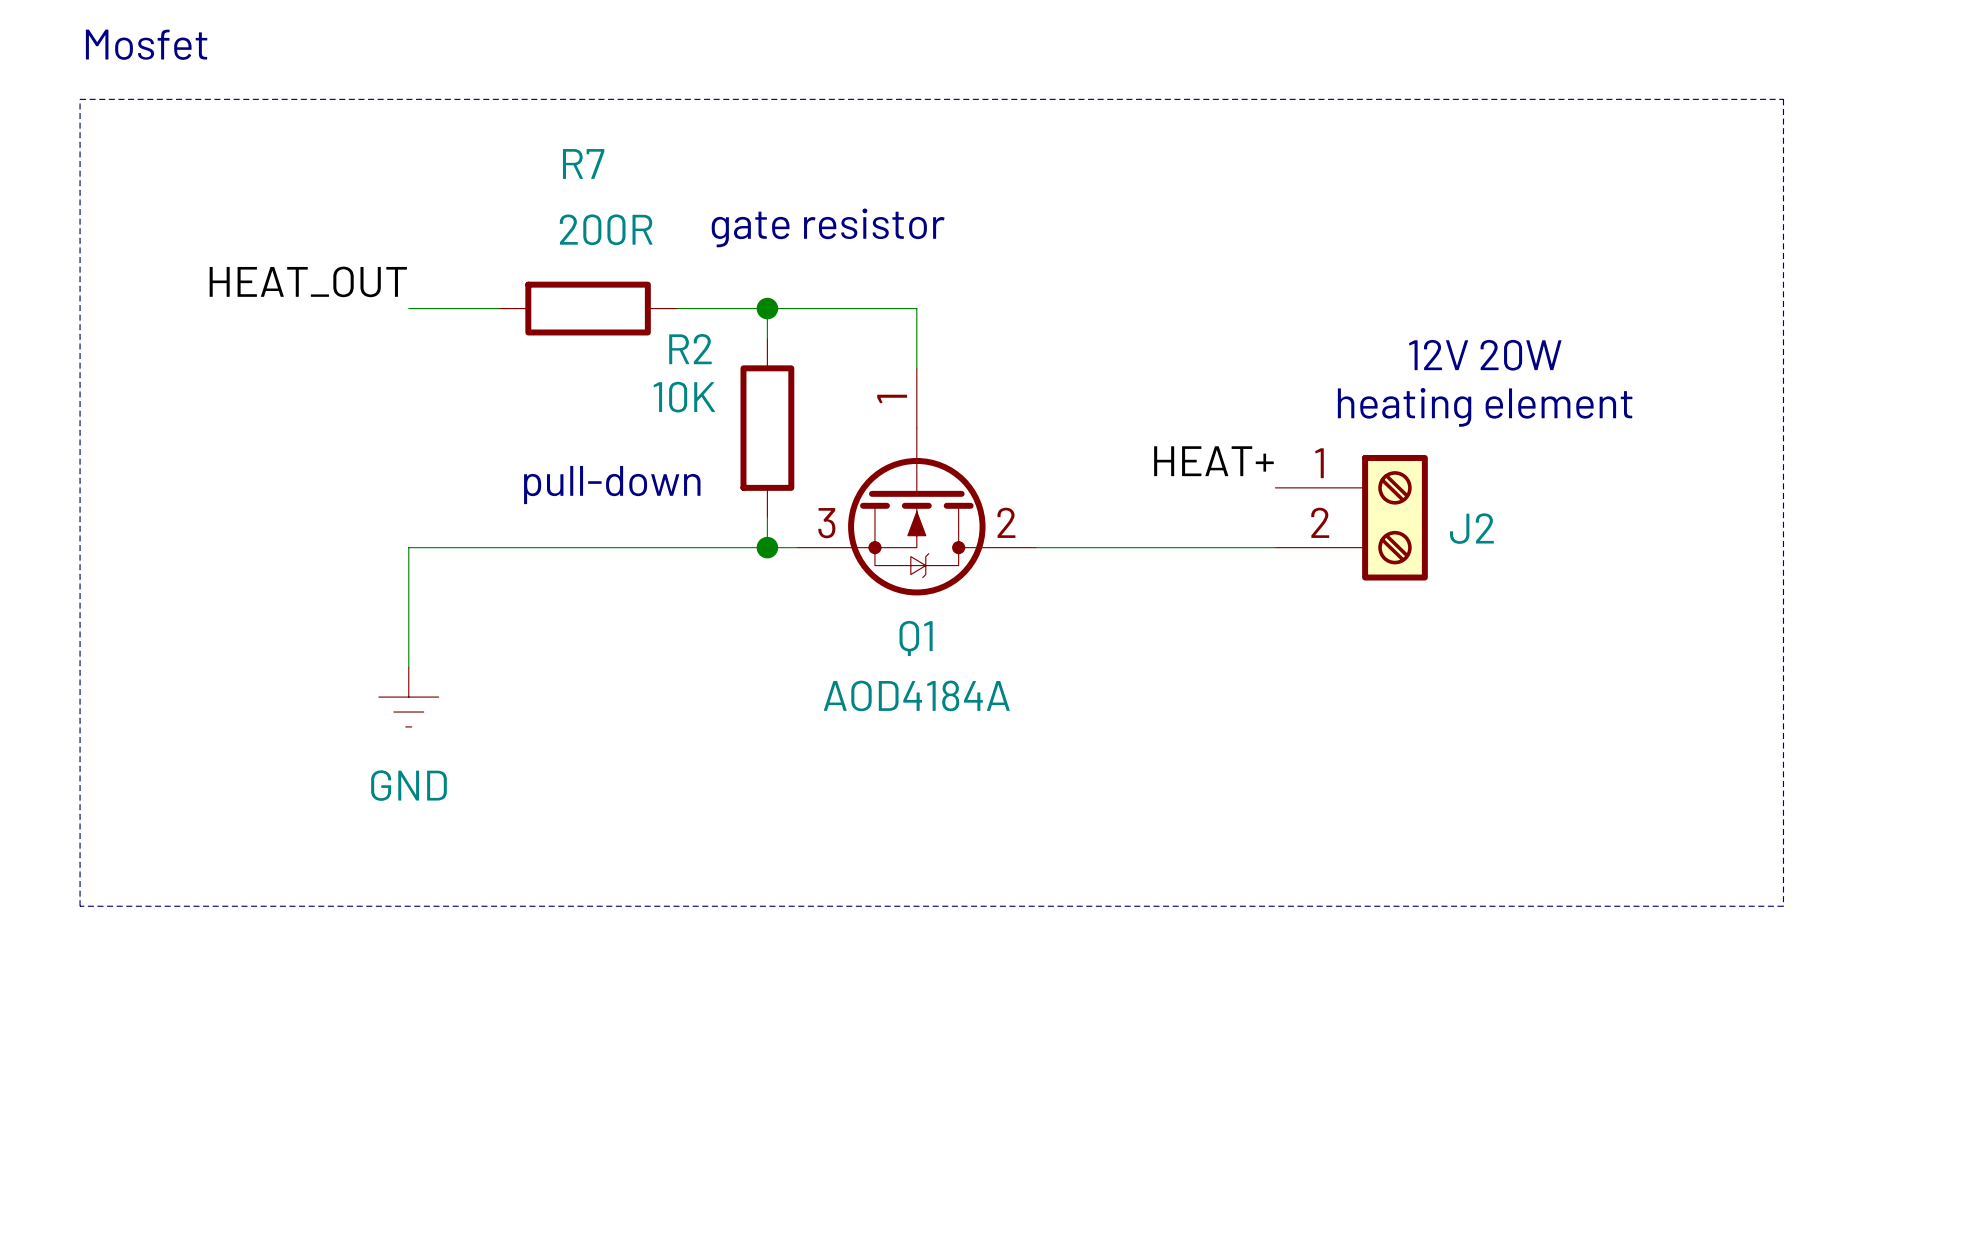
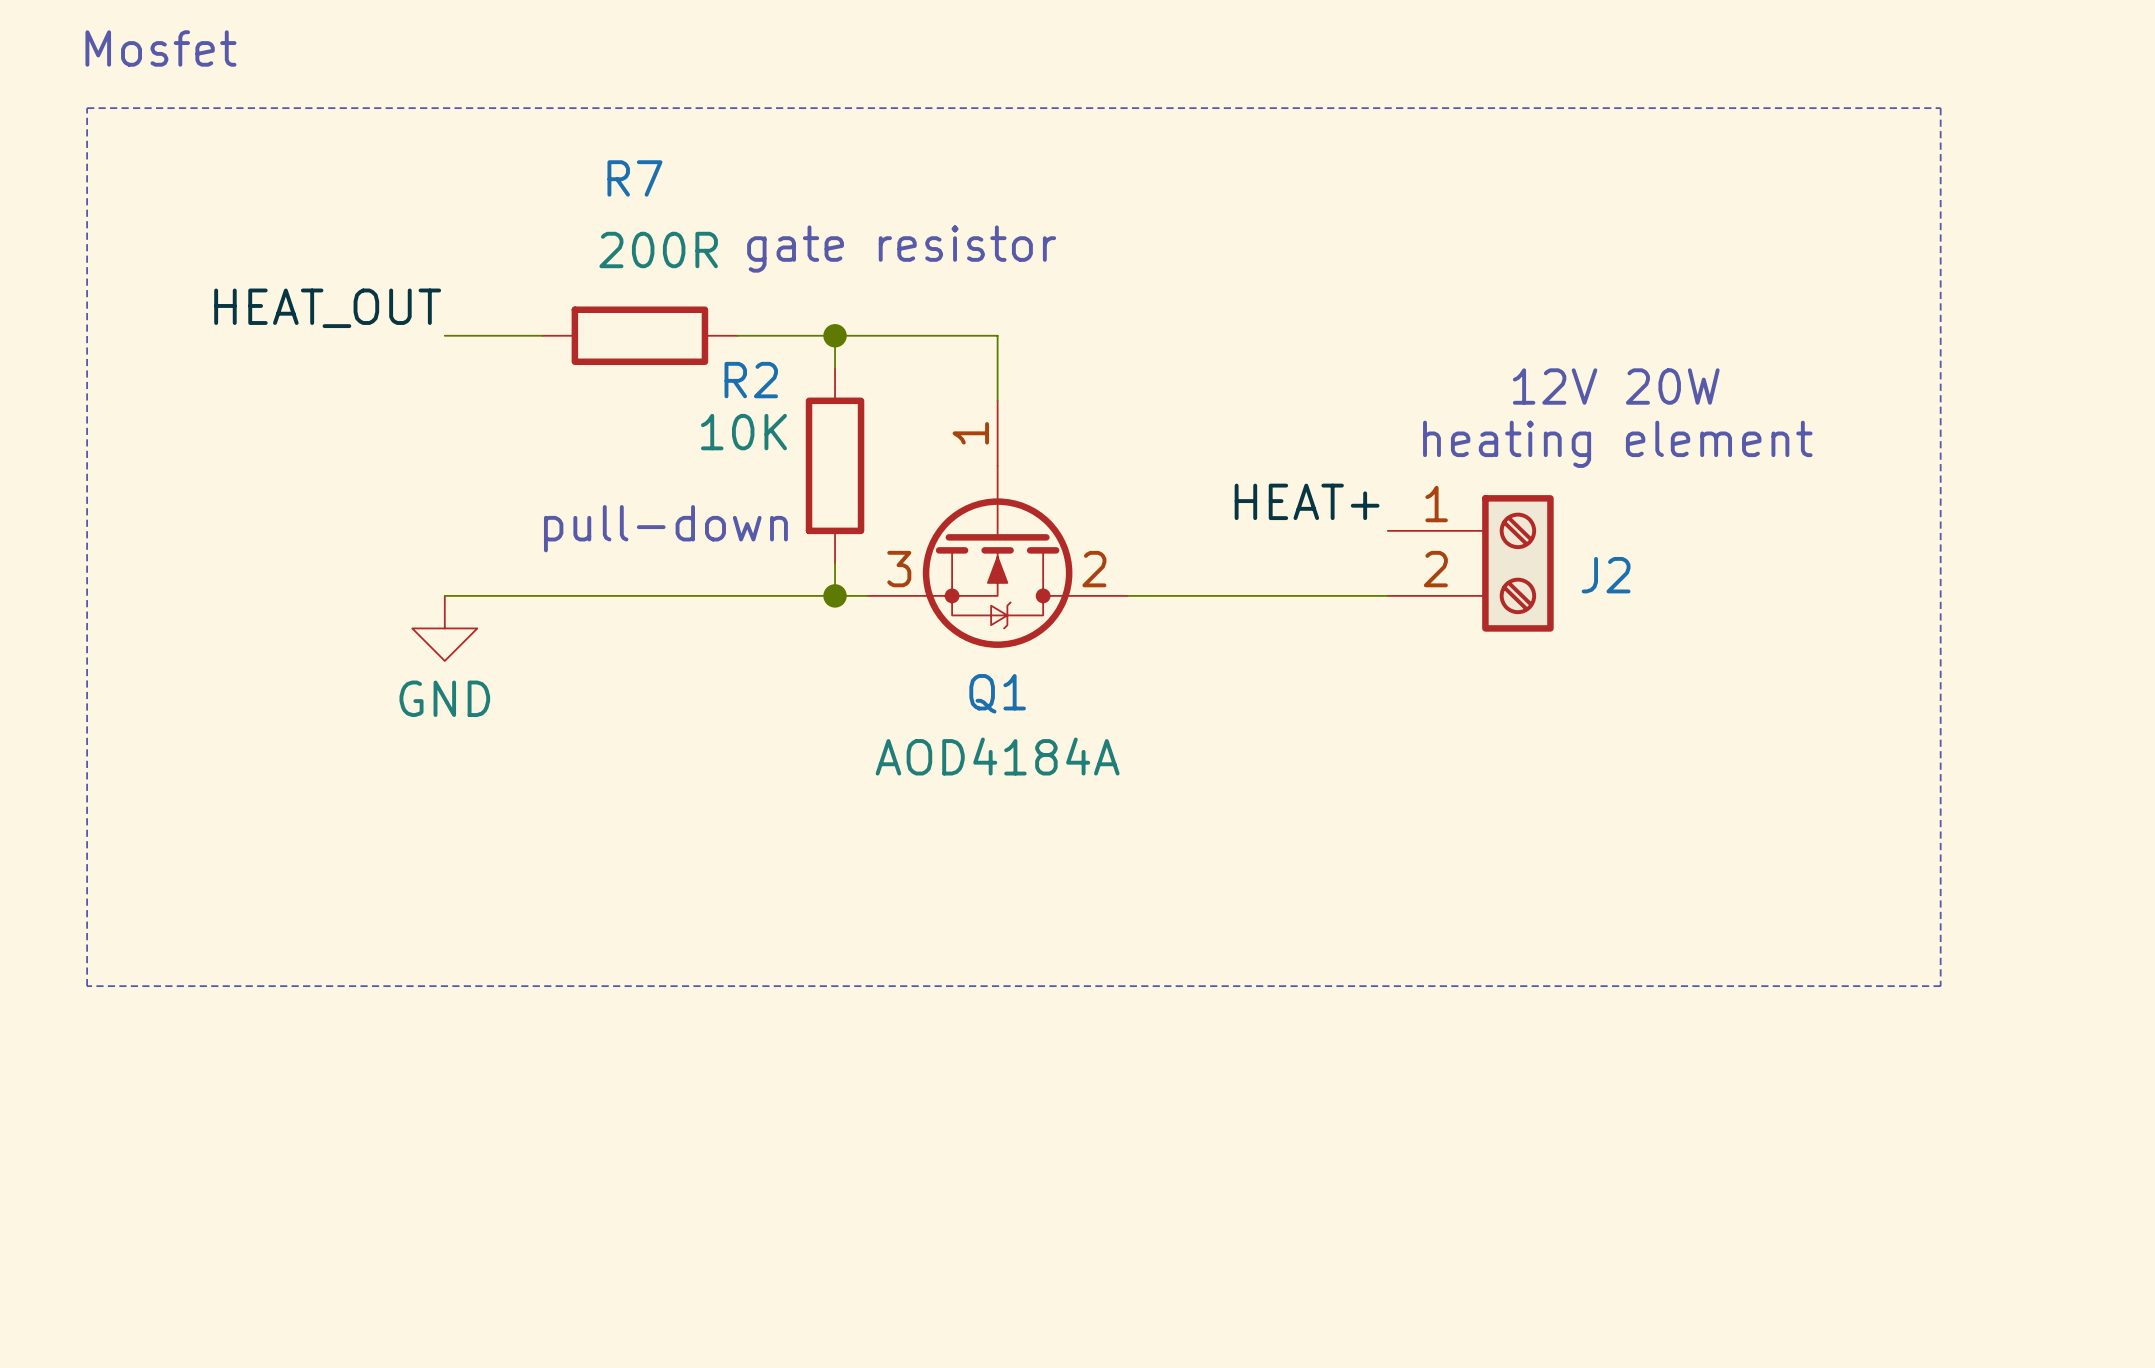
wire: (408, 547) (408, 667) -> none
power symbol: none -> GND (444, 628)
power symbol: GND (408, 697) -> none

